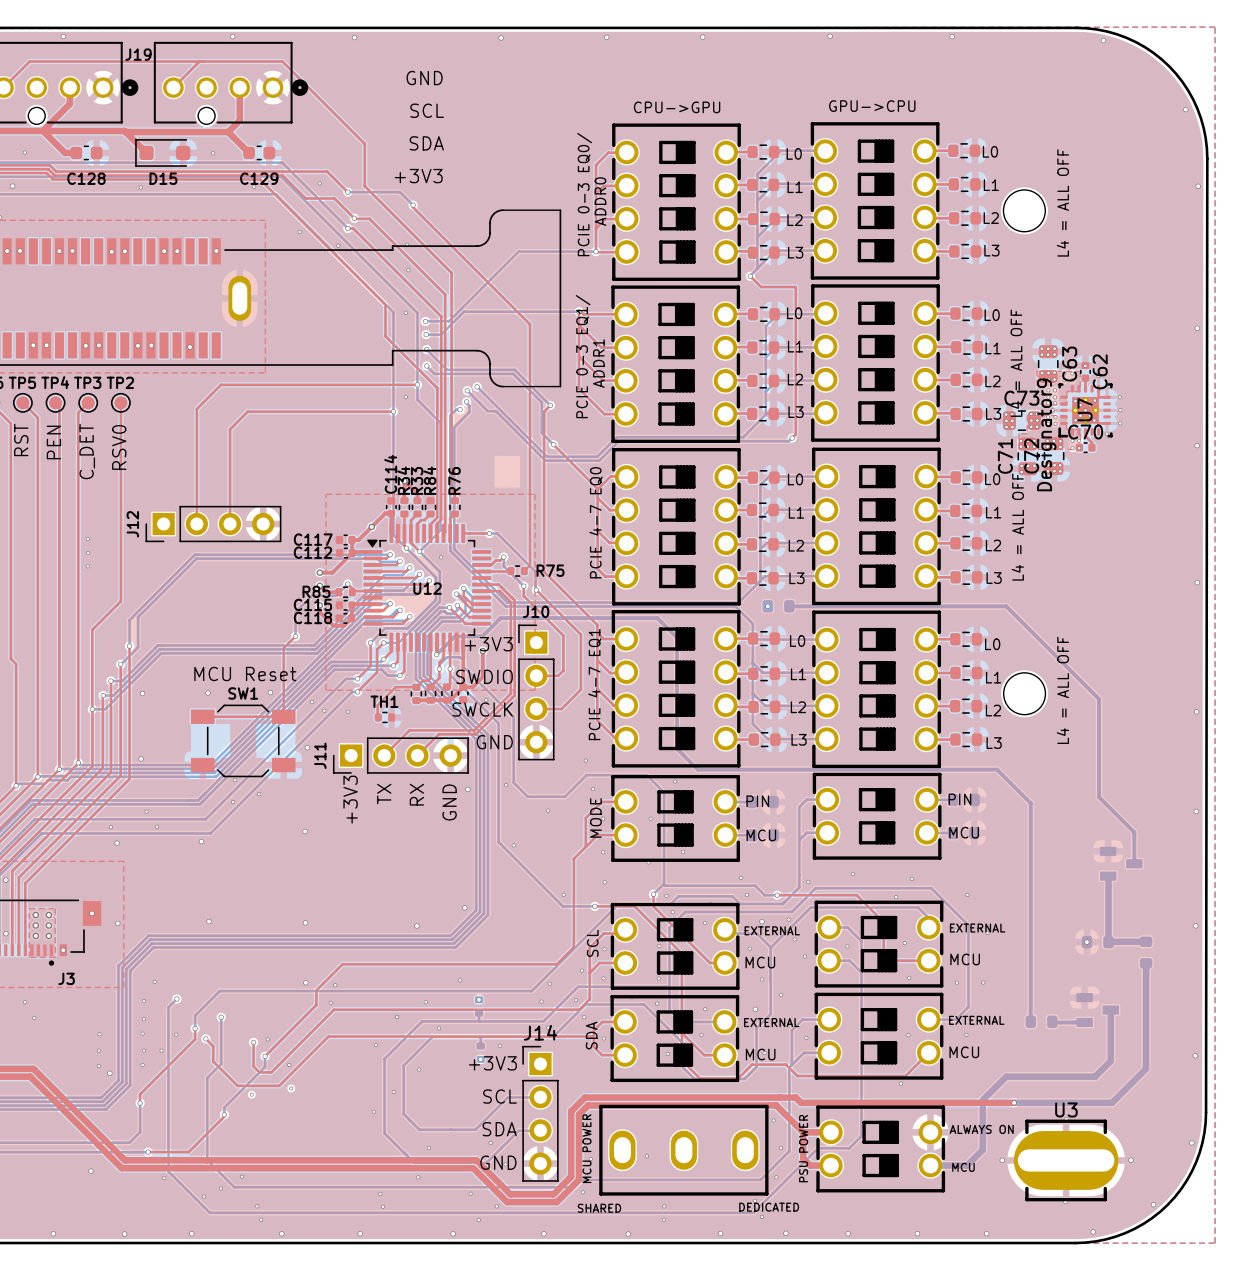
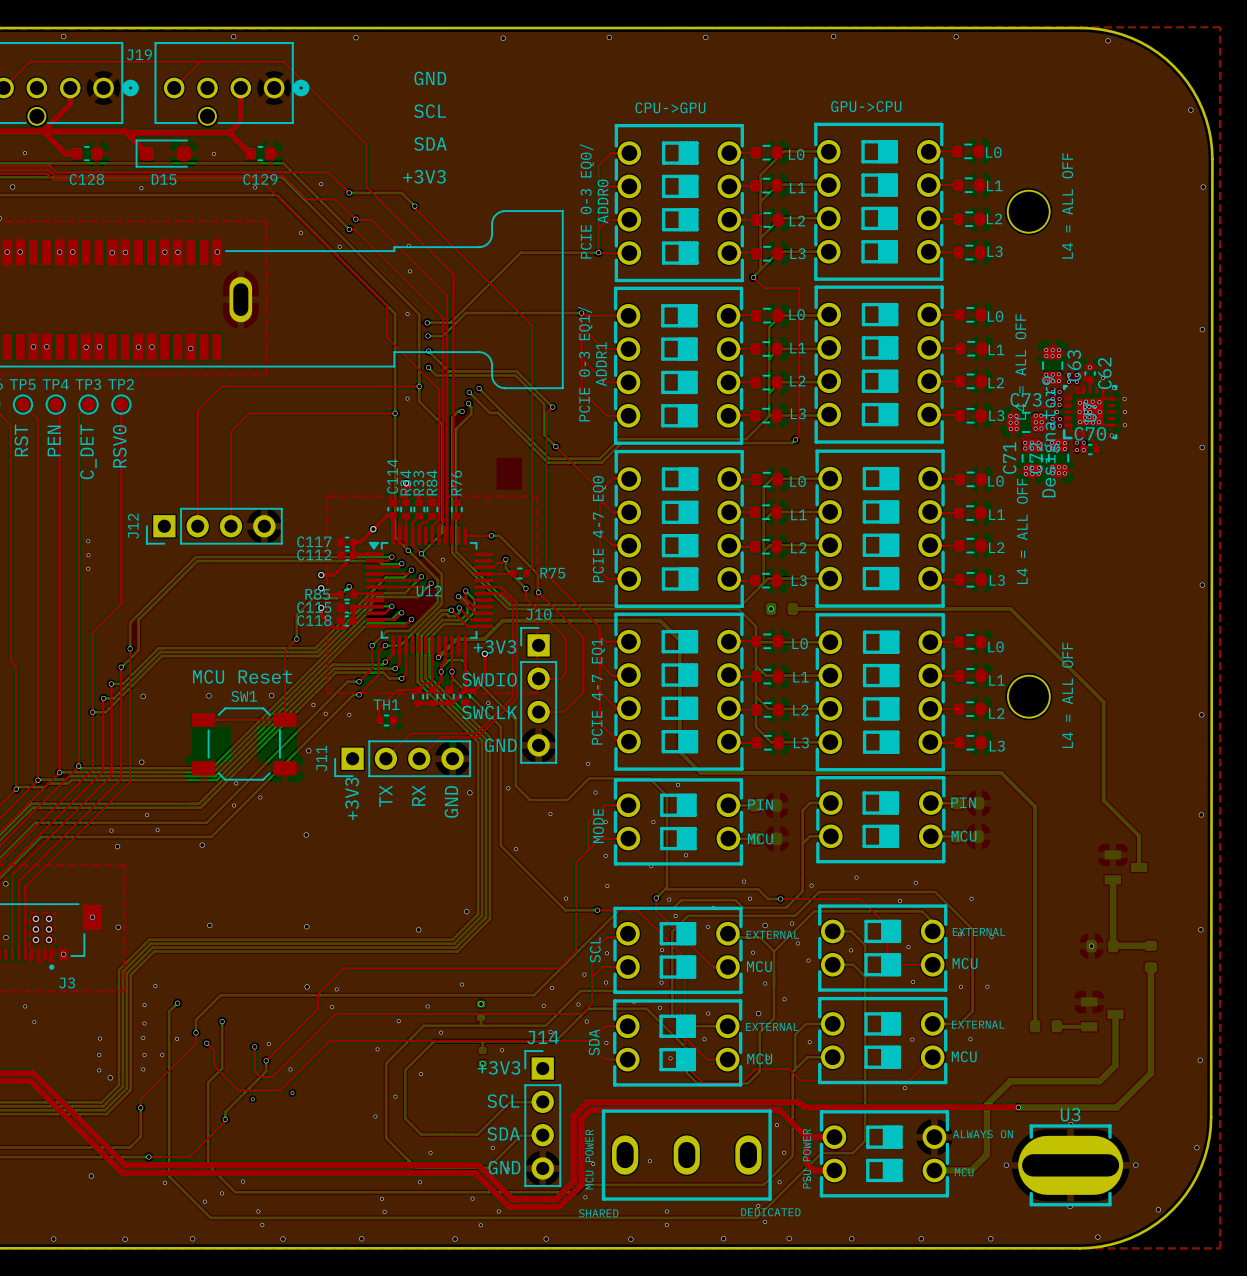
U7 footprint: [1058, 383, 1113, 438] -> [1062, 384, 1118, 440]
via: none -> (1086, 401)
via: none -> (1092, 401)
via: none -> (1089, 406)
via: none -> (1079, 412)
via: none -> (1085, 412)
via: none -> (1099, 412)
via: none -> (1089, 417)
via: none -> (1086, 422)
via: none -> (1093, 422)

